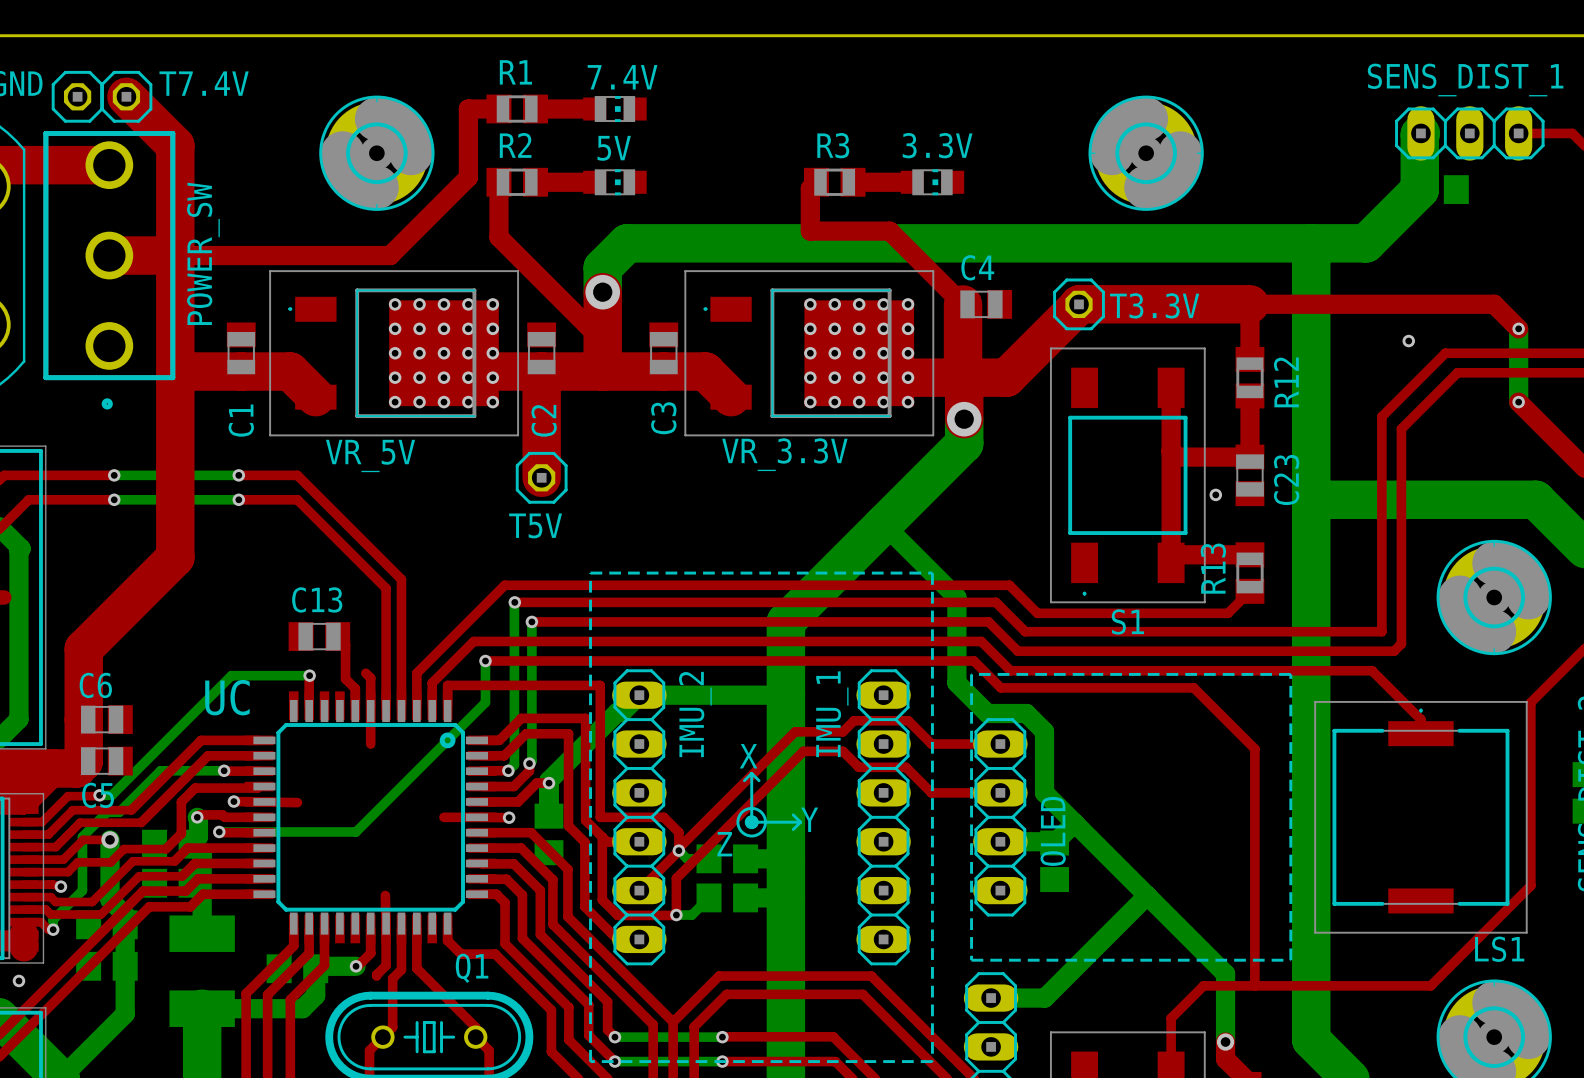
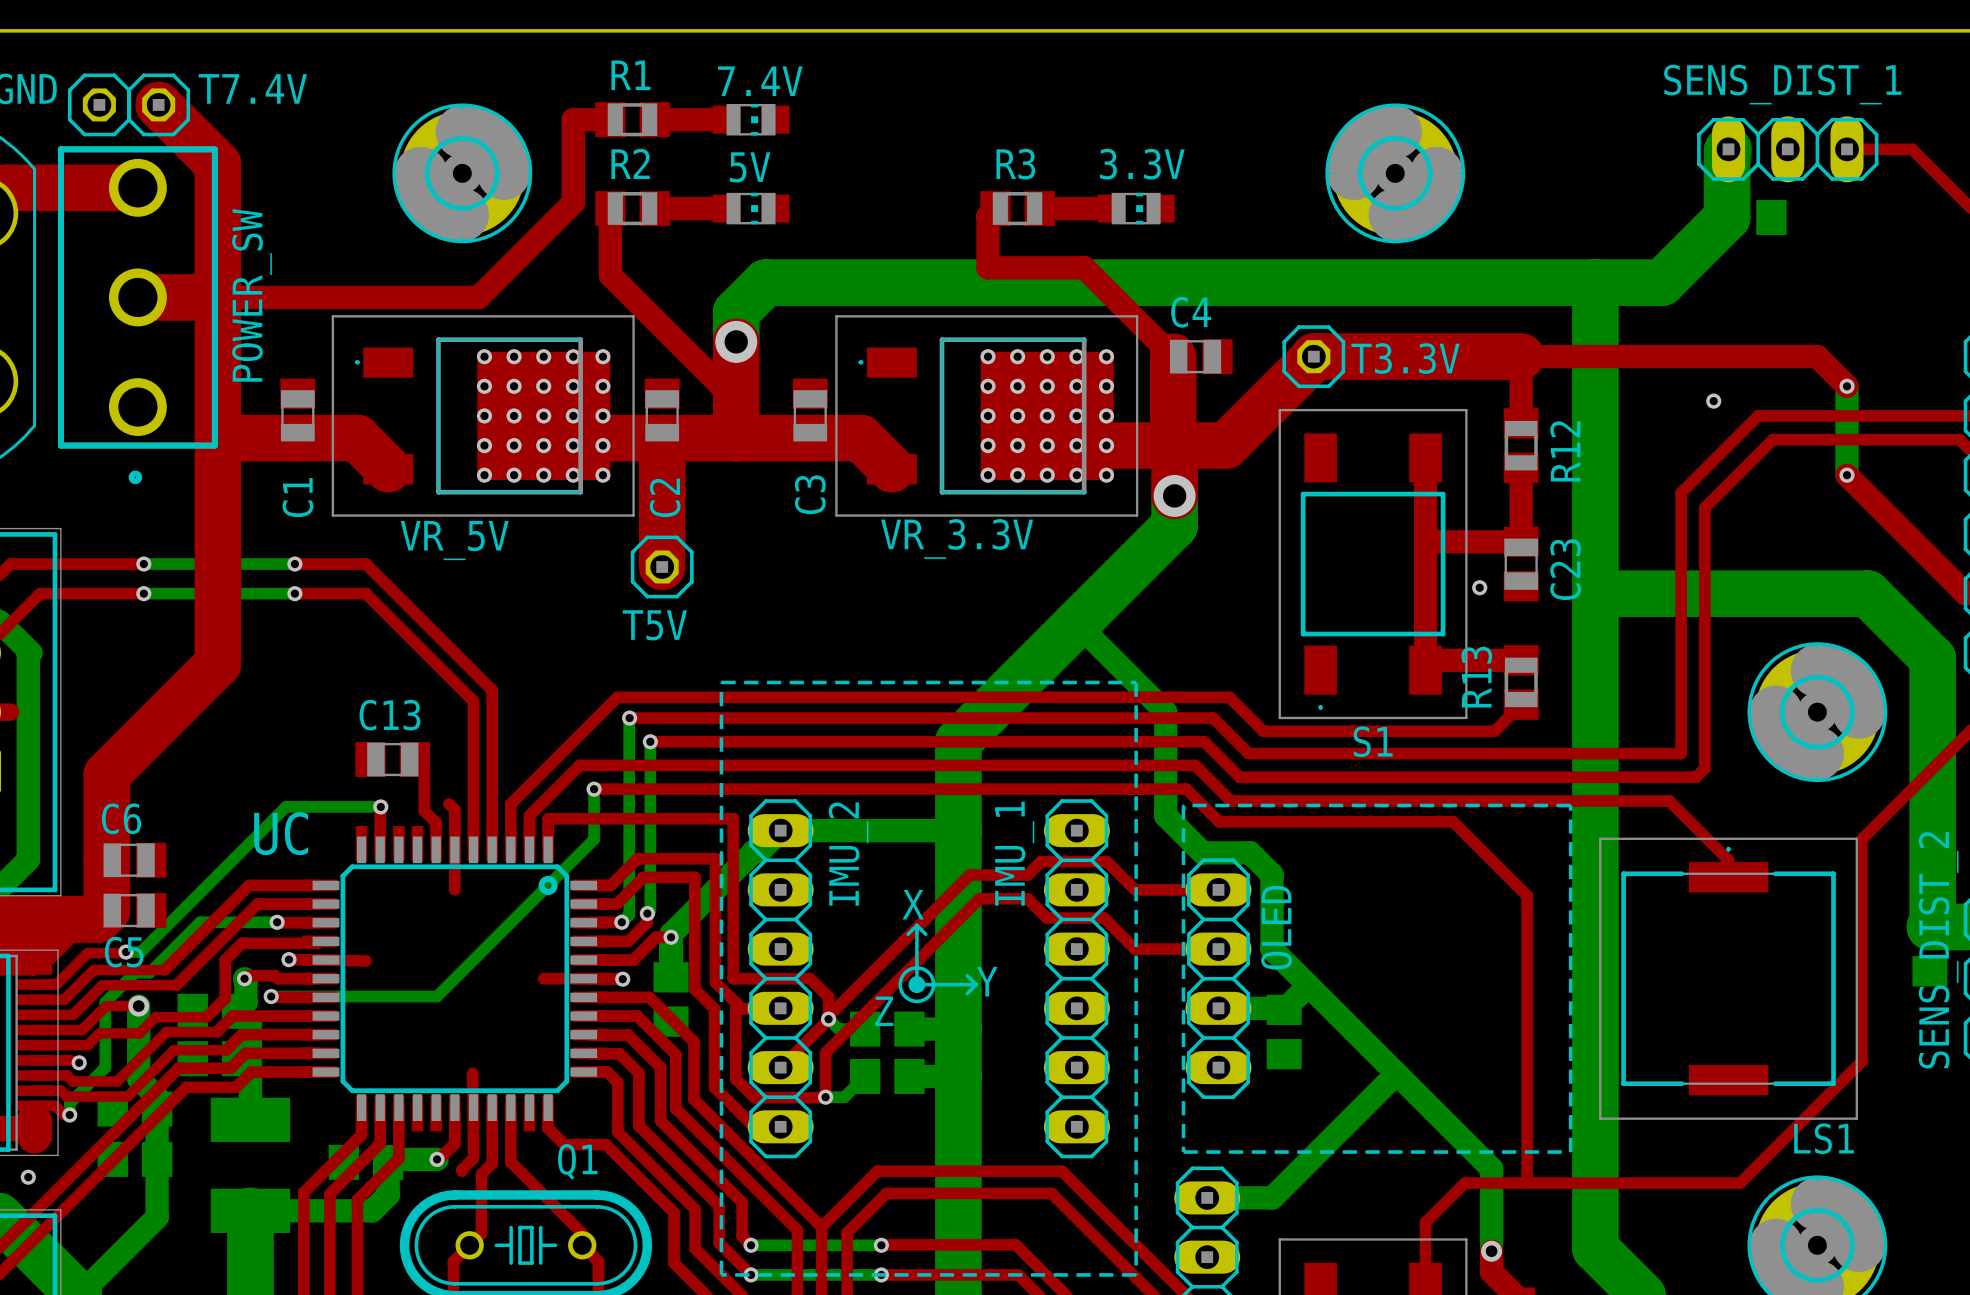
OLED name position: OLED (1053, 831) -> OLED (1276, 927)

